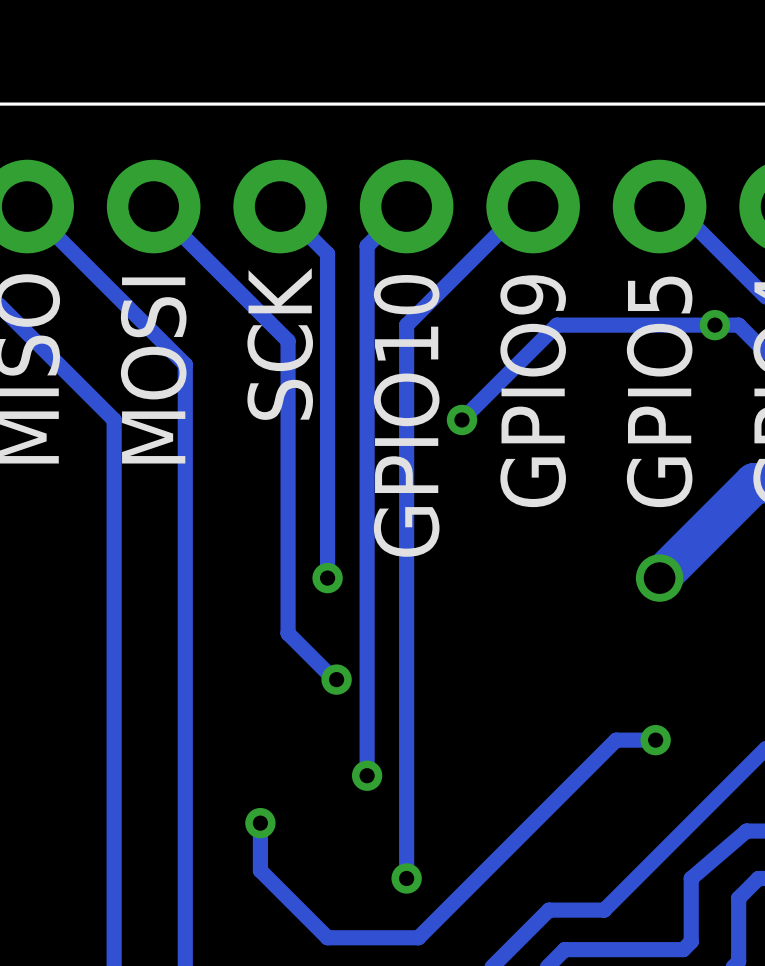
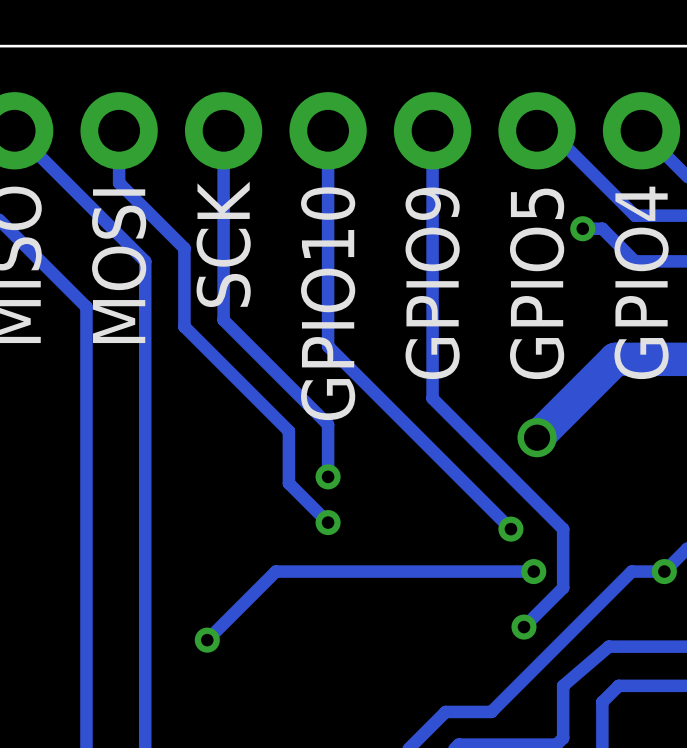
track: (153, 206) (288, 340) (288, 633) (334, 679) (336, 679) -> (119, 130) (119, 183) (184, 248) (184, 326) (288, 431) (288, 483) (328, 522)
track: (280, 206) (327, 253) (327, 578) -> (223, 130) (223, 320) (328, 424)
track: (406, 206) (367, 246) (367, 775) -> none
track: (533, 206) (525, 206) (406, 325) -> (328, 130) (328, 228)
track: none -> (432, 130) (432, 398) (563, 529) (563, 587) (523, 627)
track: (714, 325) (556, 325) (461, 419) -> none
via: (461, 419) -> none
track: (406, 467) (406, 562) -> (328, 346) (510, 529)
via: (327, 578) -> none
track: (406, 625) (406, 878) -> none
via: none -> (328, 476)
via: (336, 679) -> none
via: none -> (328, 522)
via: none -> (510, 529)
track: (616, 740) (418, 937) (327, 937) (260, 870) (260, 823) -> (501, 571) (275, 571) (207, 640)
via: (367, 775) -> none
via: none -> (523, 627)
via: (406, 878) -> none

